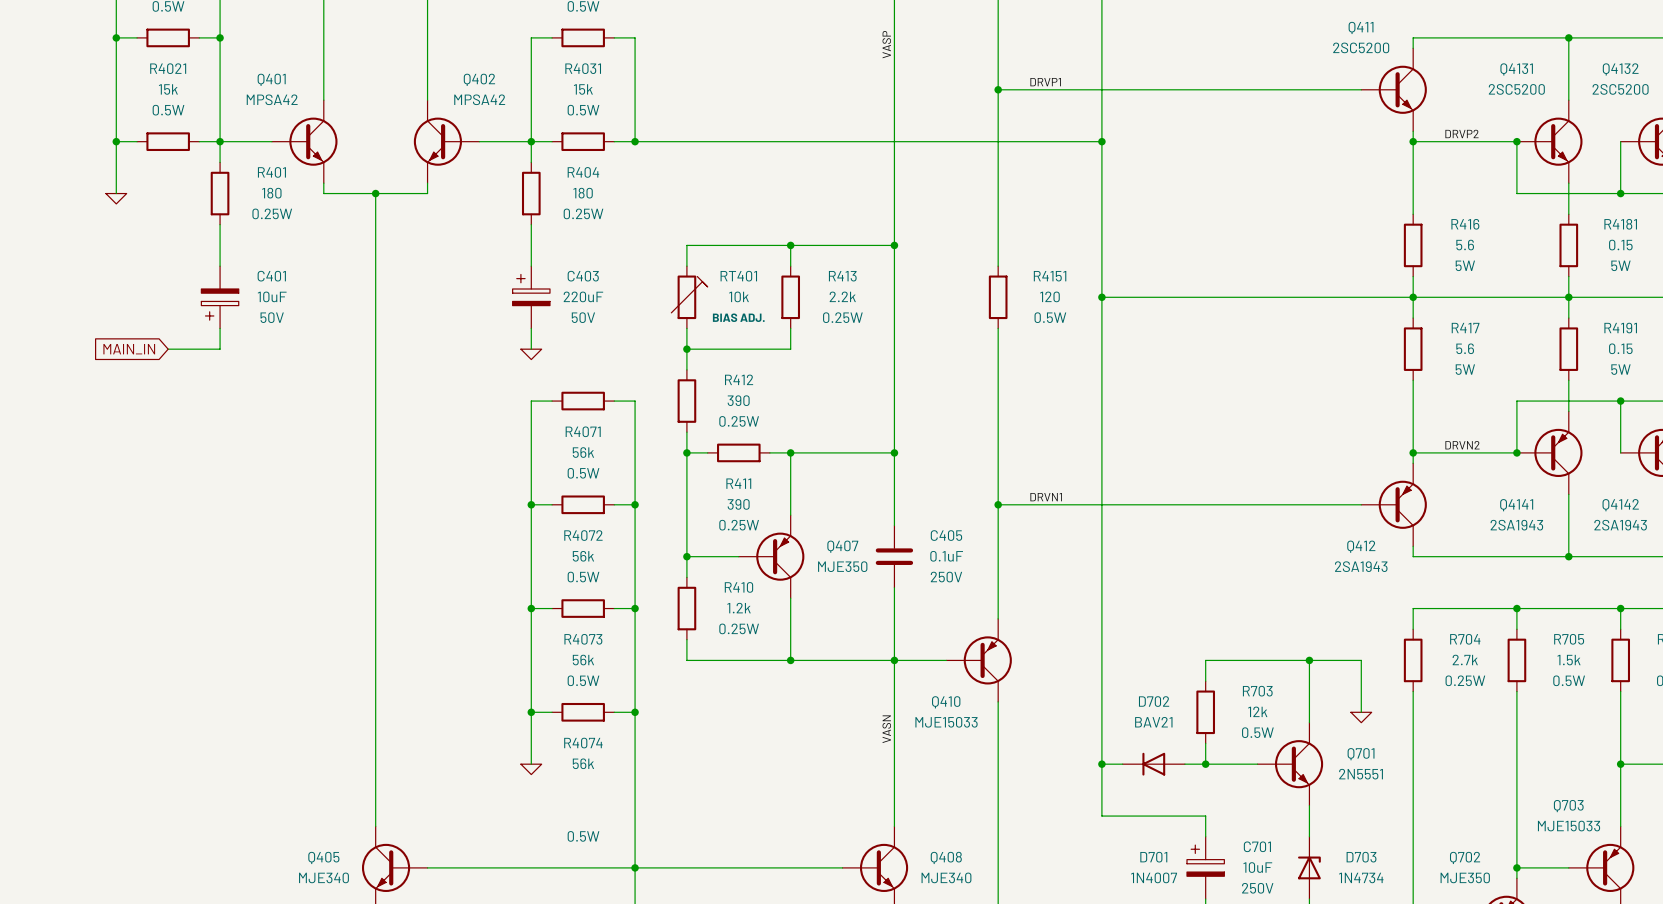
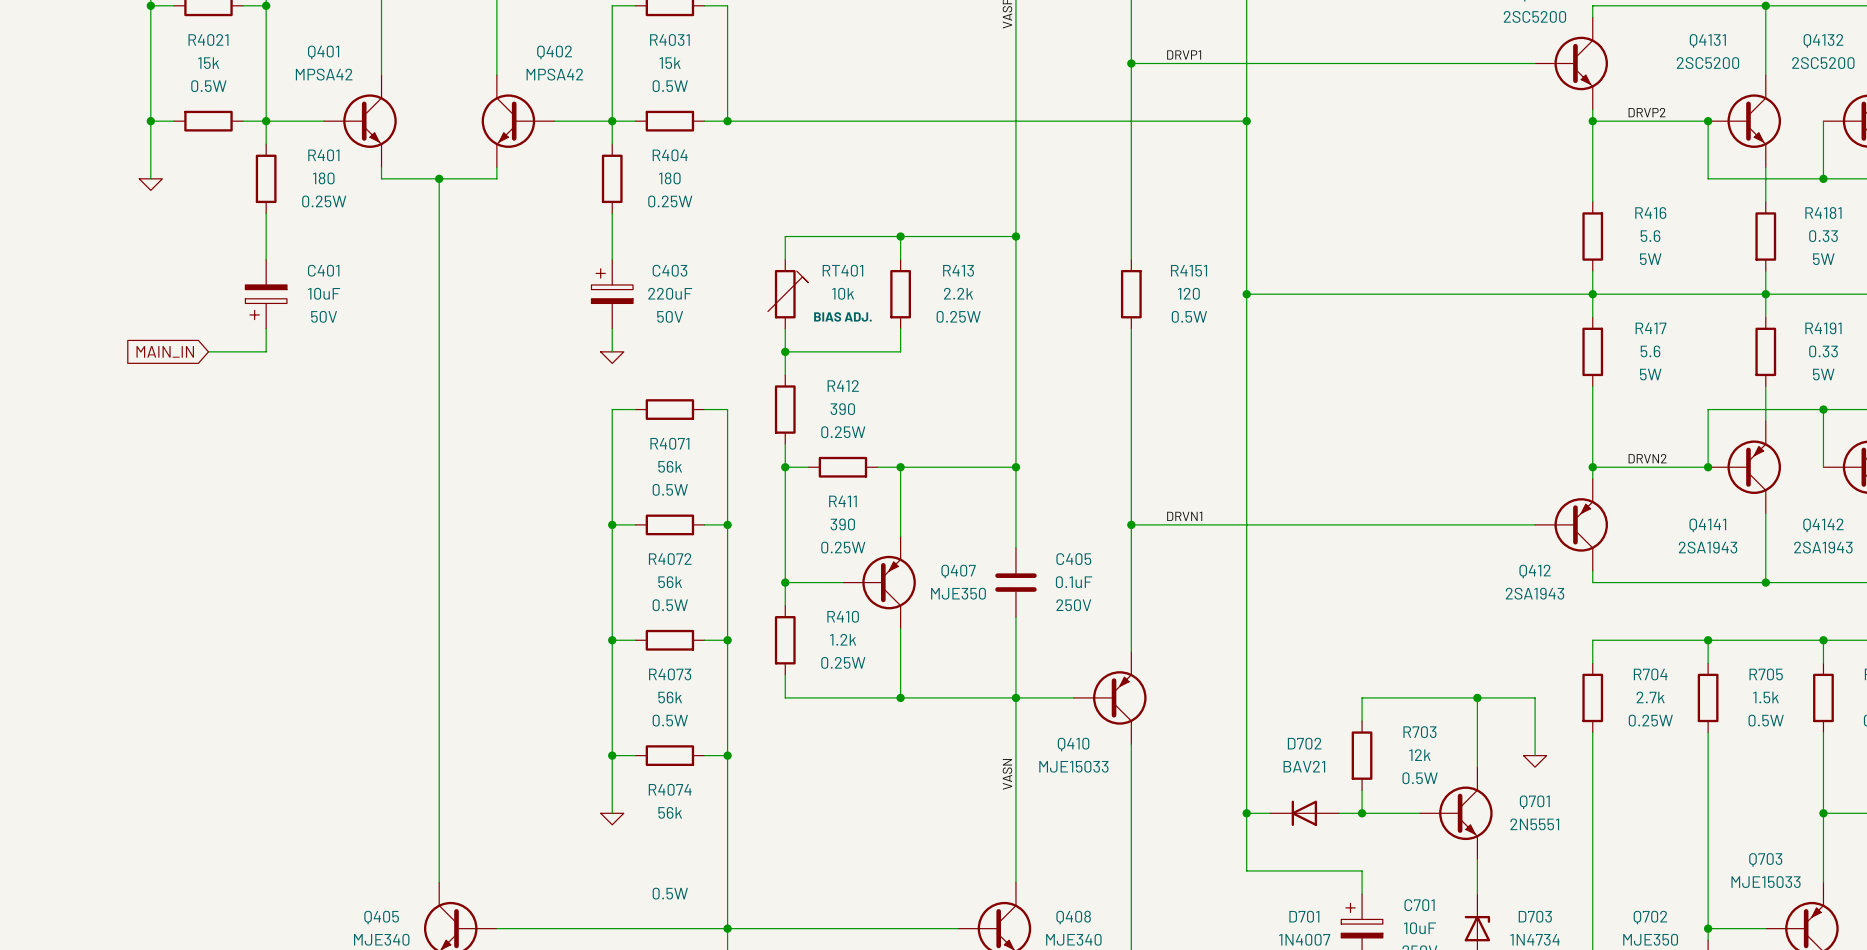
R4181 value: 0.15 (1620, 245) -> 0.33 (1823, 236)
R4191 value: 0.15 (1620, 348) -> 0.33 (1823, 351)

